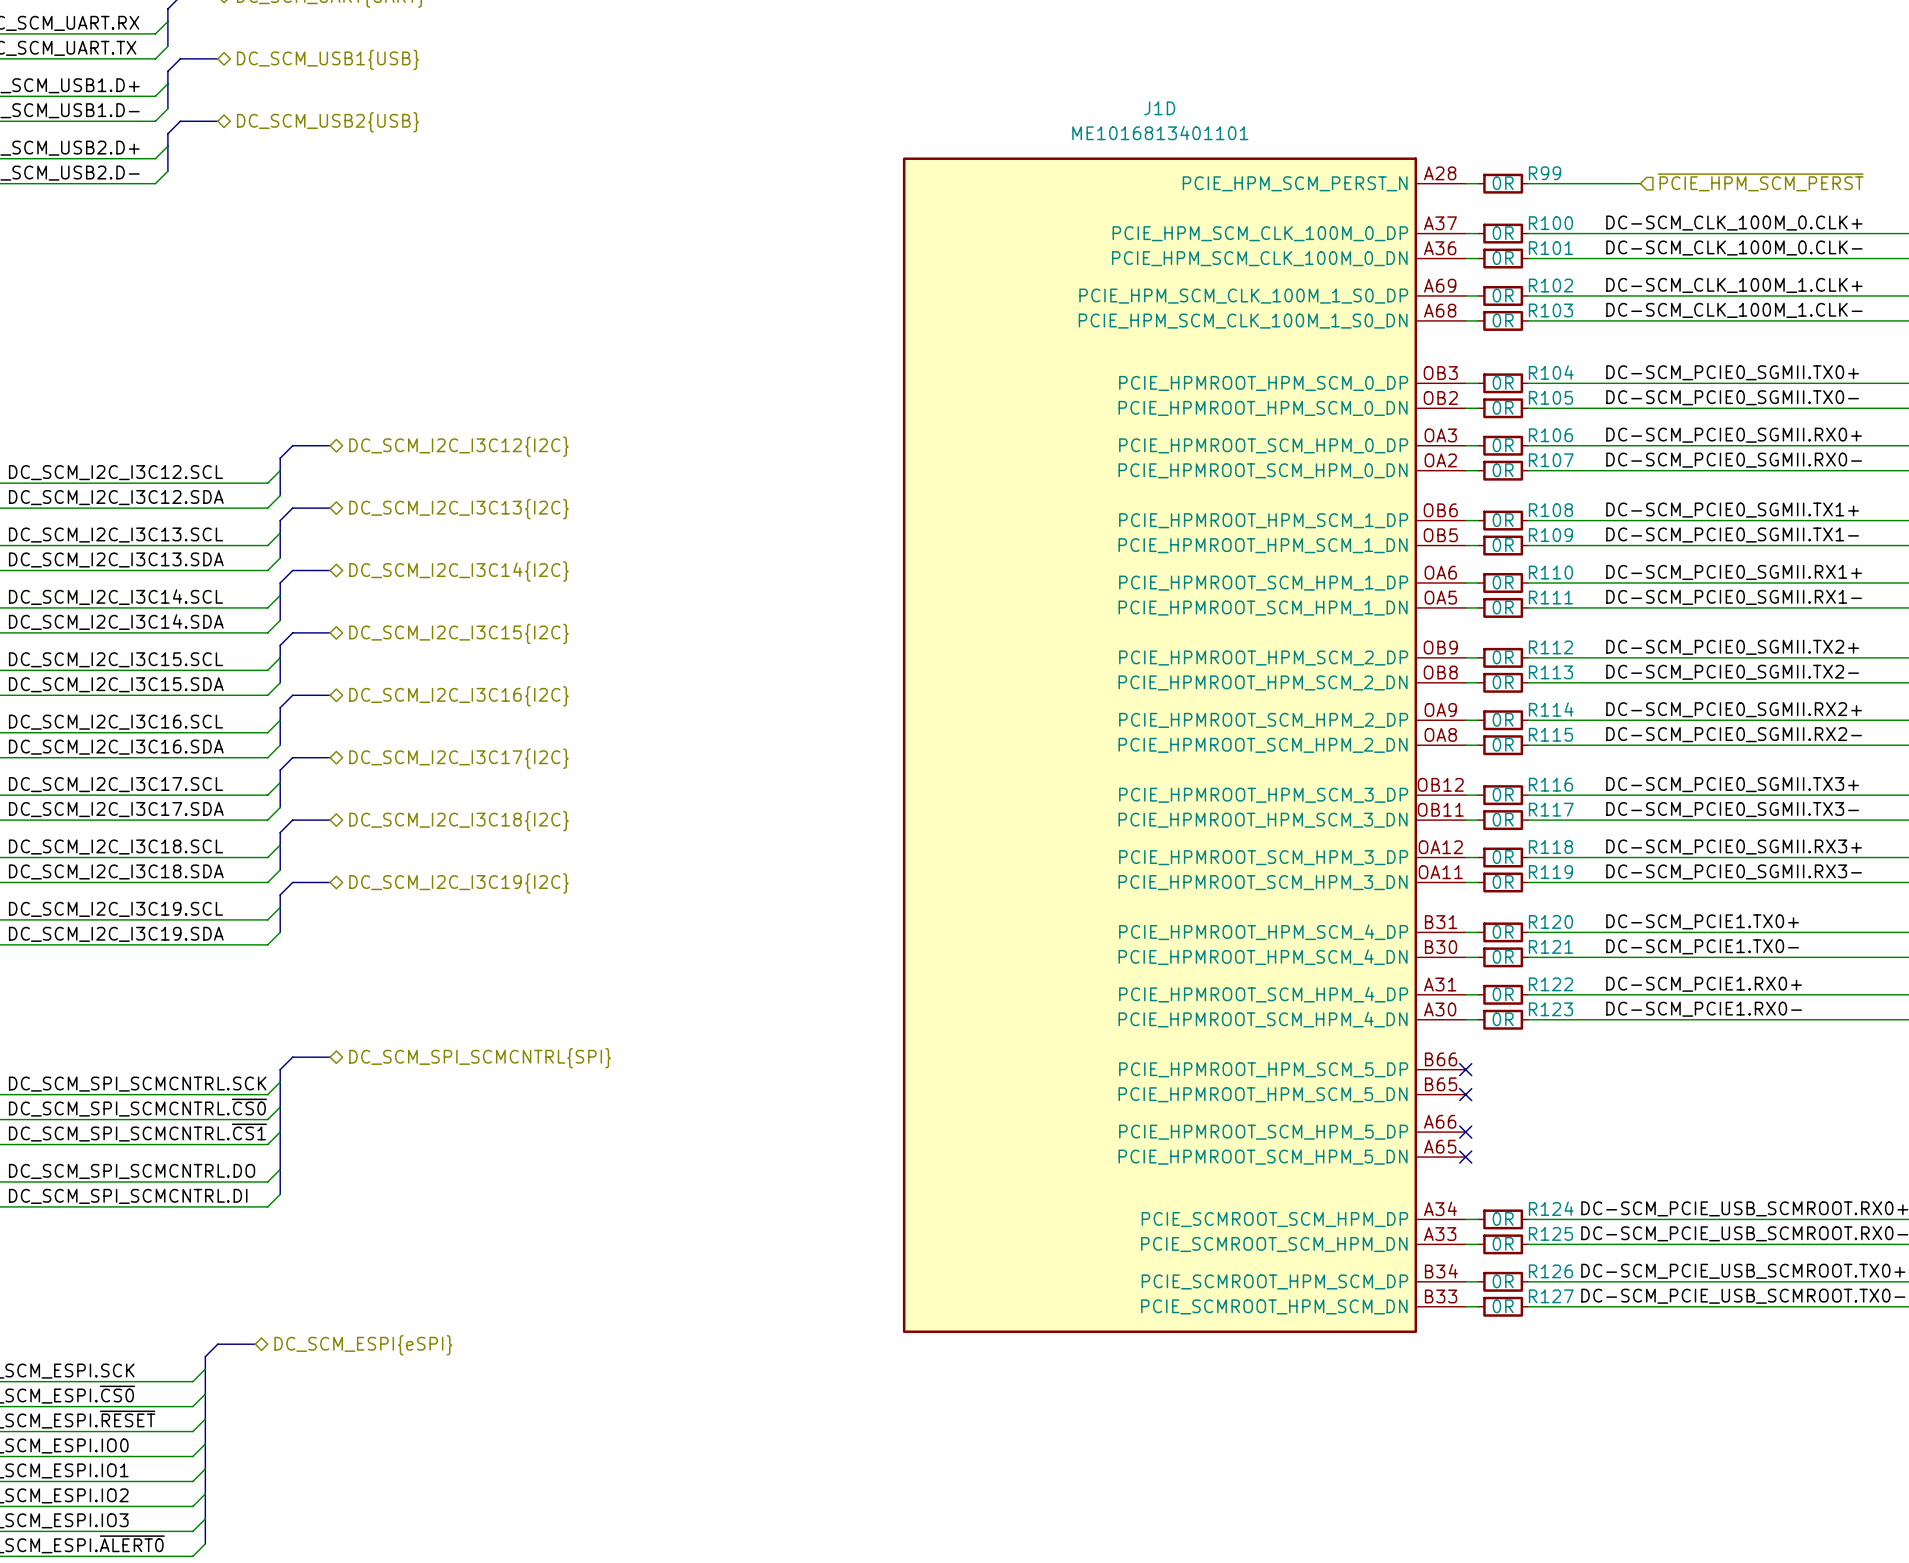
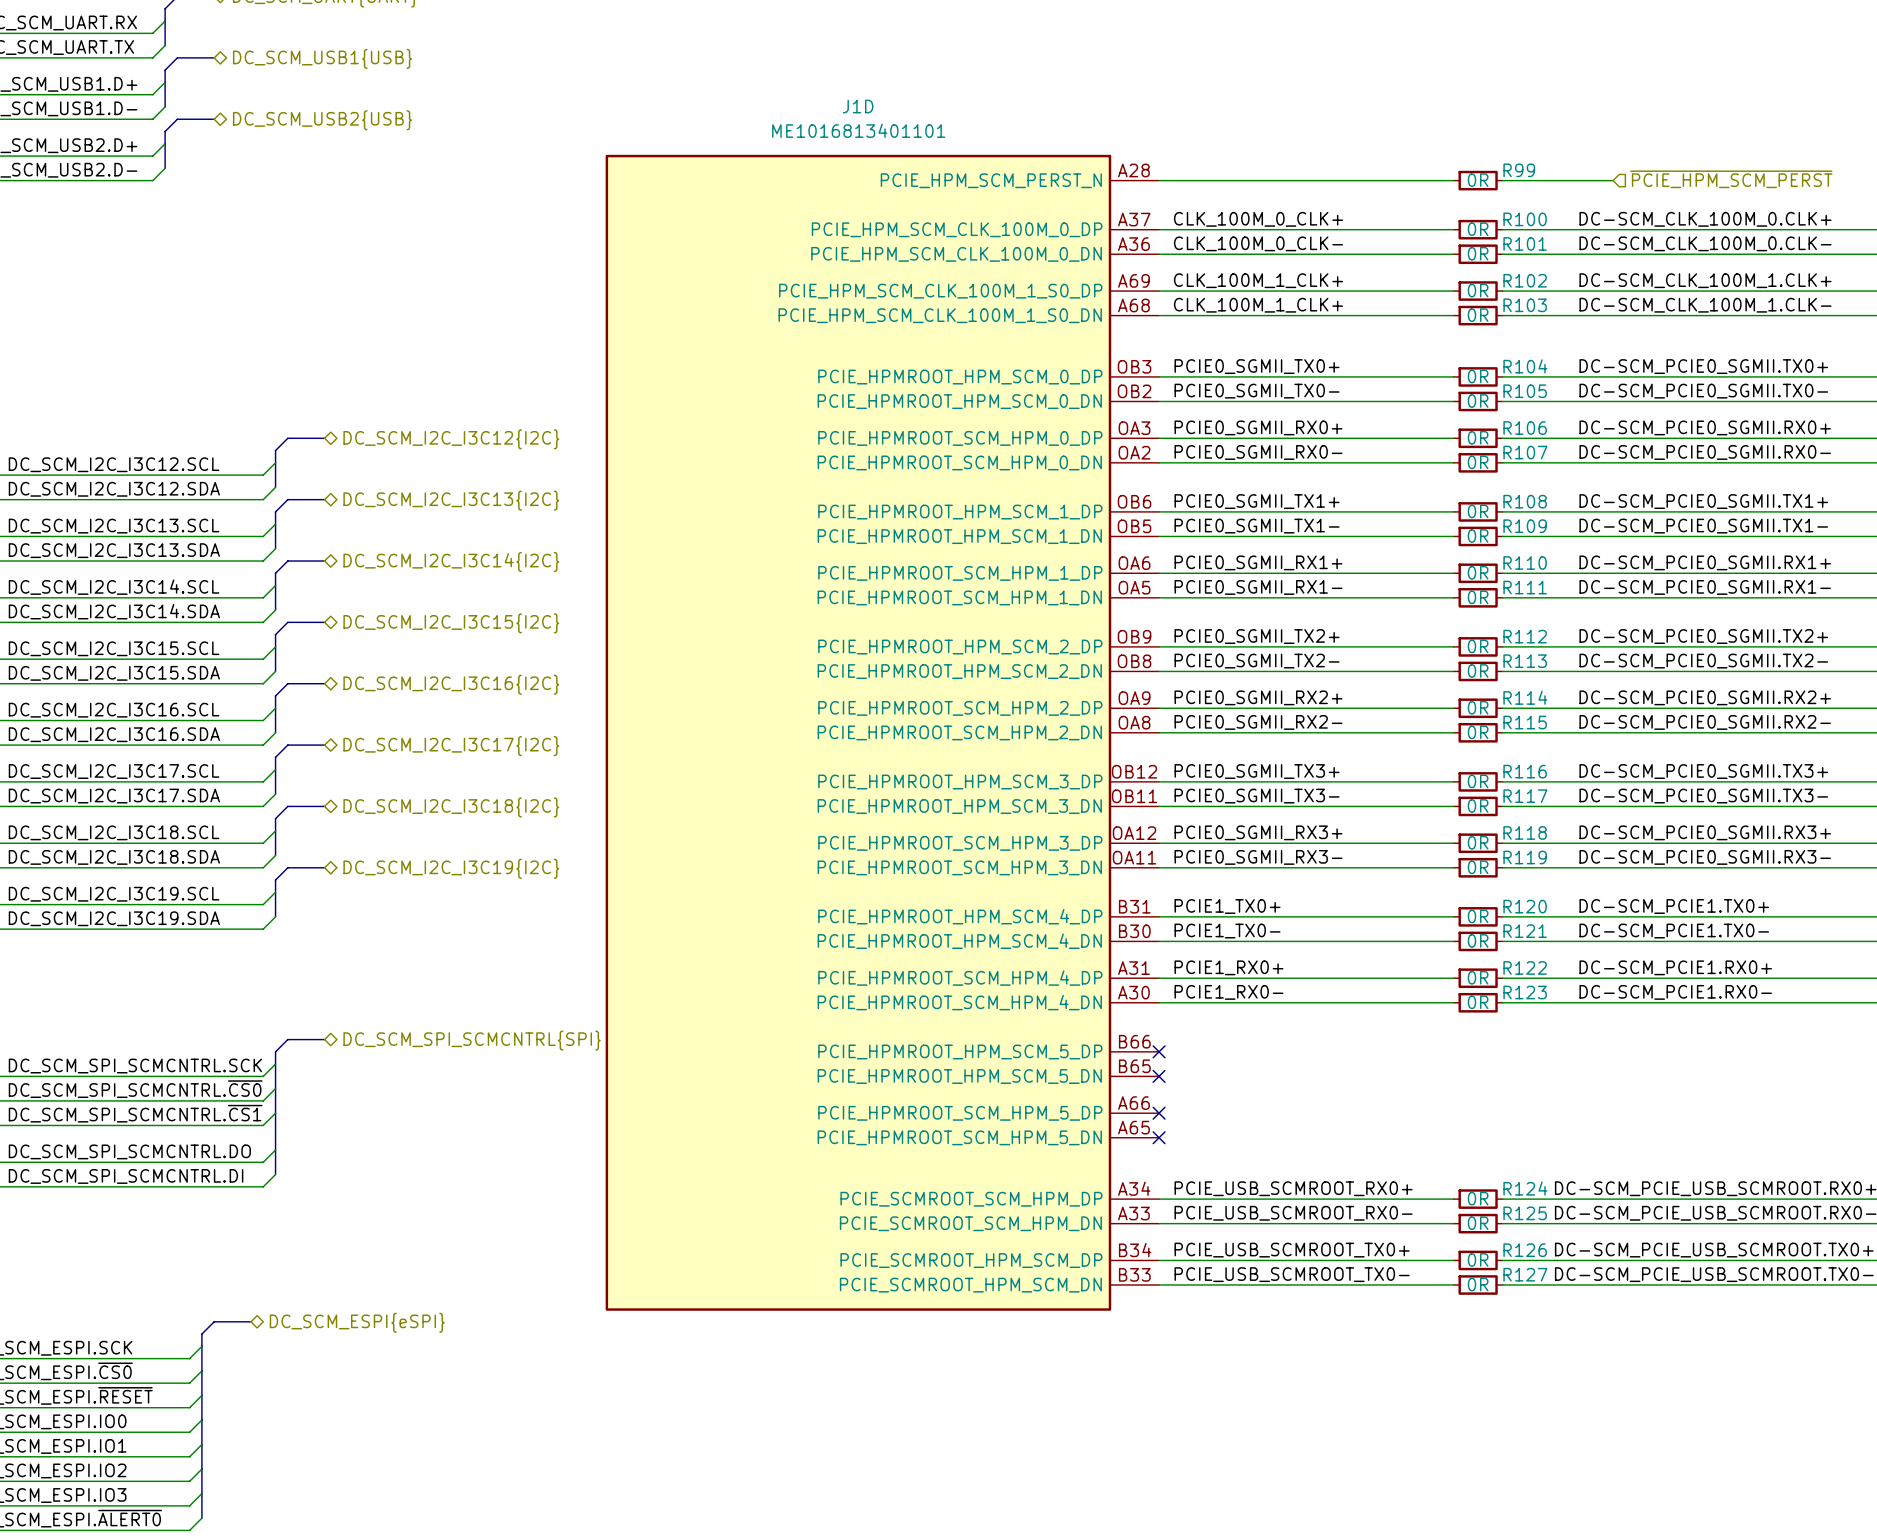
label: none -> CLK_100M_0_CLK+ (1258, 219)
label: none -> CLK_100M_0_CLK- (1258, 243)
label: none -> CLK_100M_1_CLK+ (1258, 280)
label: none -> CLK_100M_1_CLK+ (1258, 305)
label: none -> PCIE0_SGMII_TX0+ (1257, 366)
label: none -> PCIE0_SGMII_TX0- (1257, 391)
label: none -> PCIE0_SGMII_RX0+ (1258, 427)
label: none -> PCIE0_SGMII_RX0- (1258, 452)
label: none -> PCIE0_SGMII_TX1+ (1257, 501)
label: none -> PCIE0_SGMII_TX1- (1257, 526)
label: none -> PCIE0_SGMII_RX1+ (1258, 562)
label: none -> PCIE0_SGMII_RX1- (1258, 587)
label: none -> PCIE0_SGMII_TX2+ (1257, 636)
label: none -> PCIE0_SGMII_TX2- (1257, 661)
label: none -> PCIE0_SGMII_RX2+ (1258, 697)
label: none -> PCIE0_SGMII_RX2- (1258, 722)
J1D position: (1184, 745) -> (882, 732)
label: none -> PCIE0_SGMII_TX3+ (1257, 771)
label: none -> PCIE0_SGMII_TX3- (1257, 796)
label: none -> PCIE0_SGMII_RX3+ (1258, 832)
label: none -> PCIE0_SGMII_RX3- (1258, 857)
label: none -> PCIE1_TX0+ (1227, 906)
label: none -> PCIE1_TX0- (1227, 931)
label: none -> PCIE1_RX0+ (1228, 967)
label: none -> PCIE1_RX0- (1228, 992)
no-connect mark: none -> (1159, 1051)
no-connect mark: (1465, 1069) -> none
no-connect mark: none -> (1159, 1076)
no-connect mark: (1465, 1094) -> none
no-connect mark: none -> (1159, 1113)
no-connect mark: (1465, 1132) -> none
no-connect mark: none -> (1159, 1137)
no-connect mark: (1465, 1157) -> none
label: none -> PCIE_USB_SCMROOT_RX0+ (1293, 1188)
label: none -> PCIE_USB_SCMROOT_RX0- (1293, 1213)
label: none -> PCIE_USB_SCMROOT_TX0+ (1292, 1250)
label: none -> PCIE_USB_SCMROOT_TX0- (1292, 1274)

